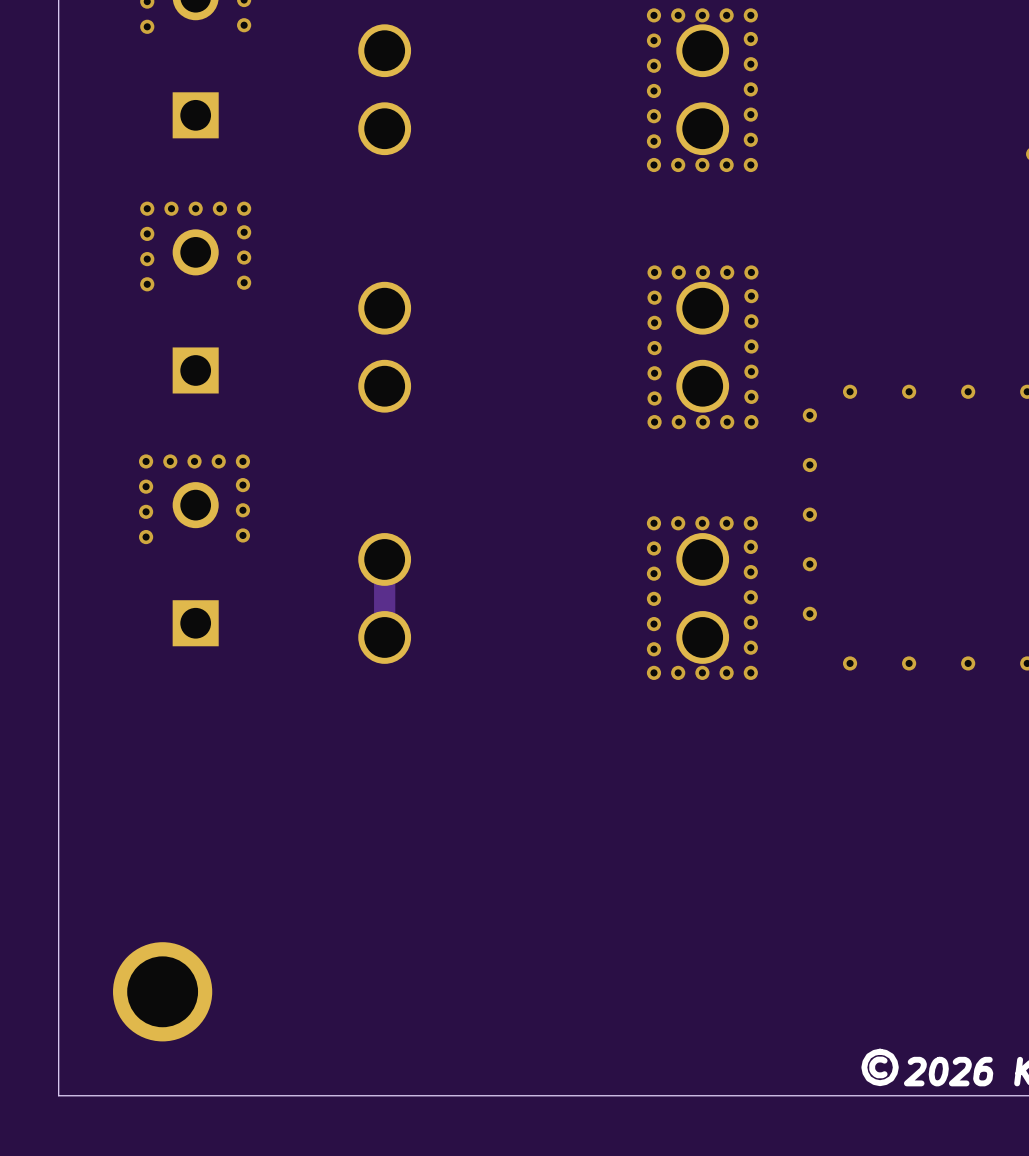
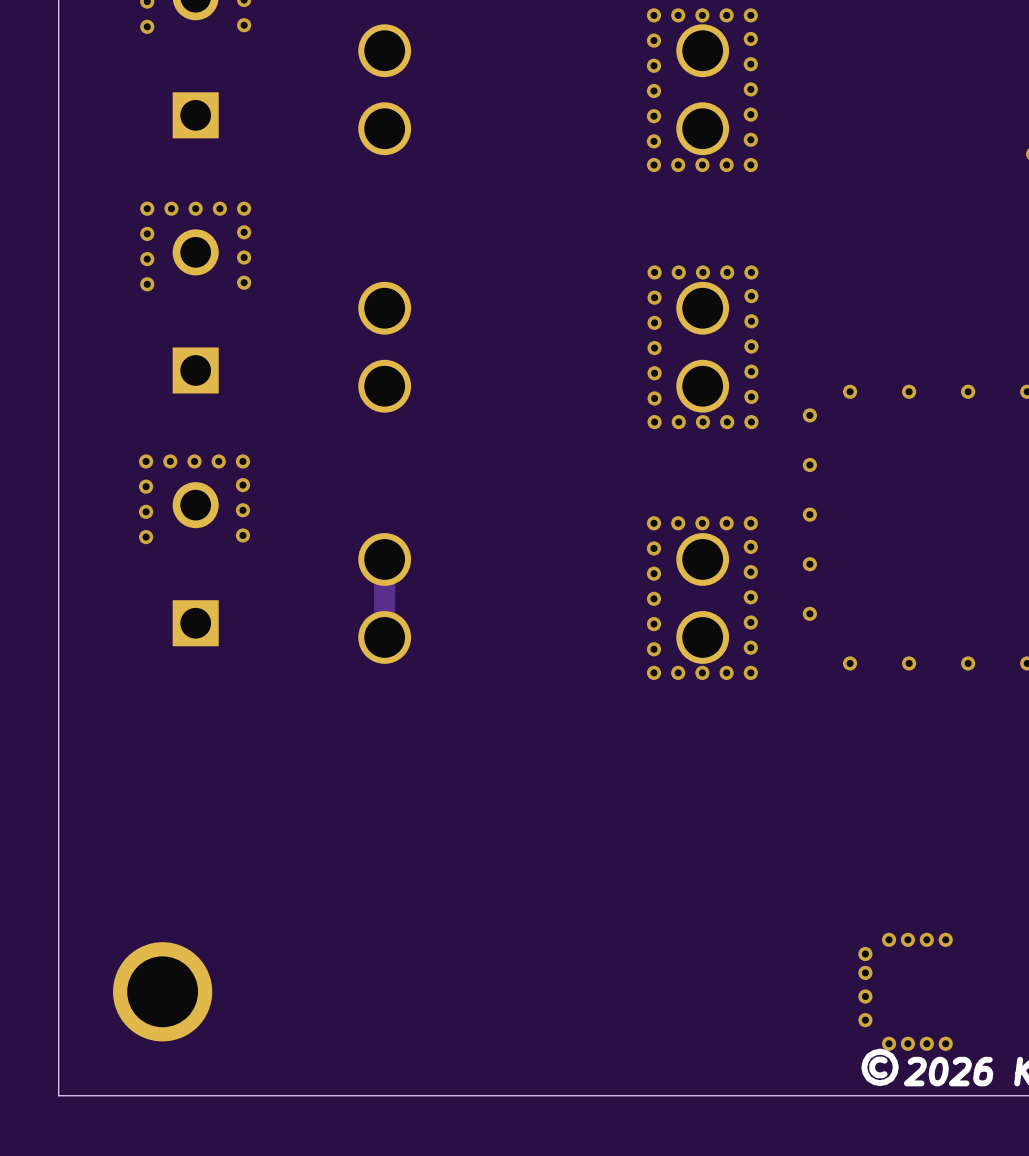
via: none -> (889, 939)
via: none -> (907, 939)
via: none -> (926, 939)
via: none -> (945, 939)
via: none -> (865, 954)
via: none -> (865, 972)
via: none -> (865, 996)
via: none -> (865, 1020)
via: none -> (889, 1043)
via: none -> (907, 1043)
via: none -> (926, 1043)
via: none -> (945, 1043)

